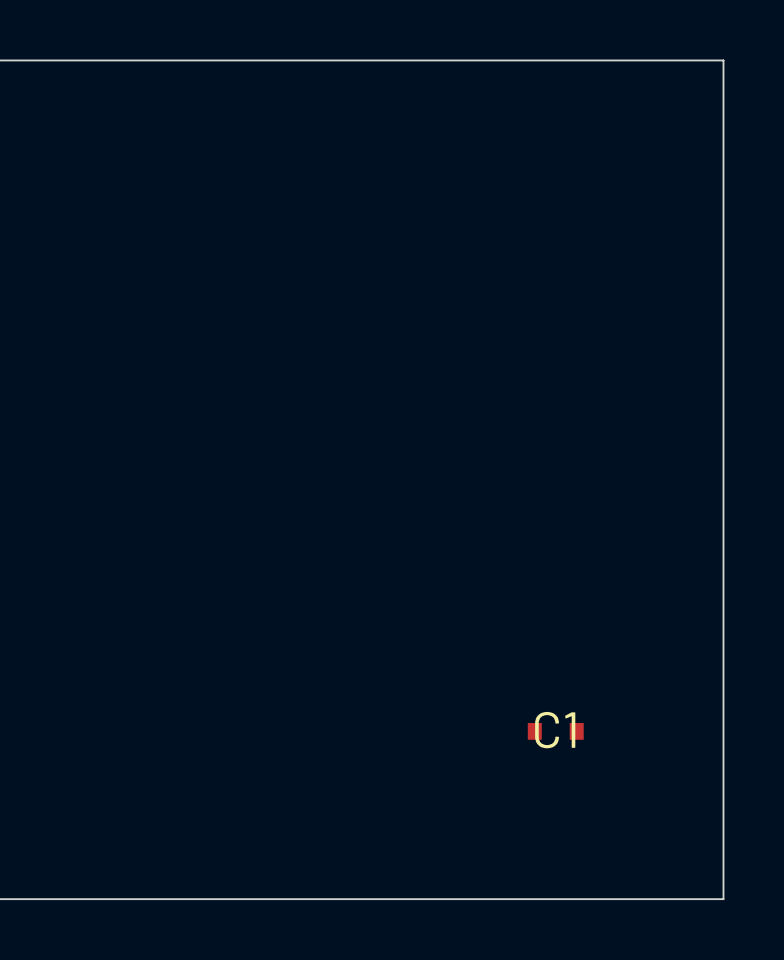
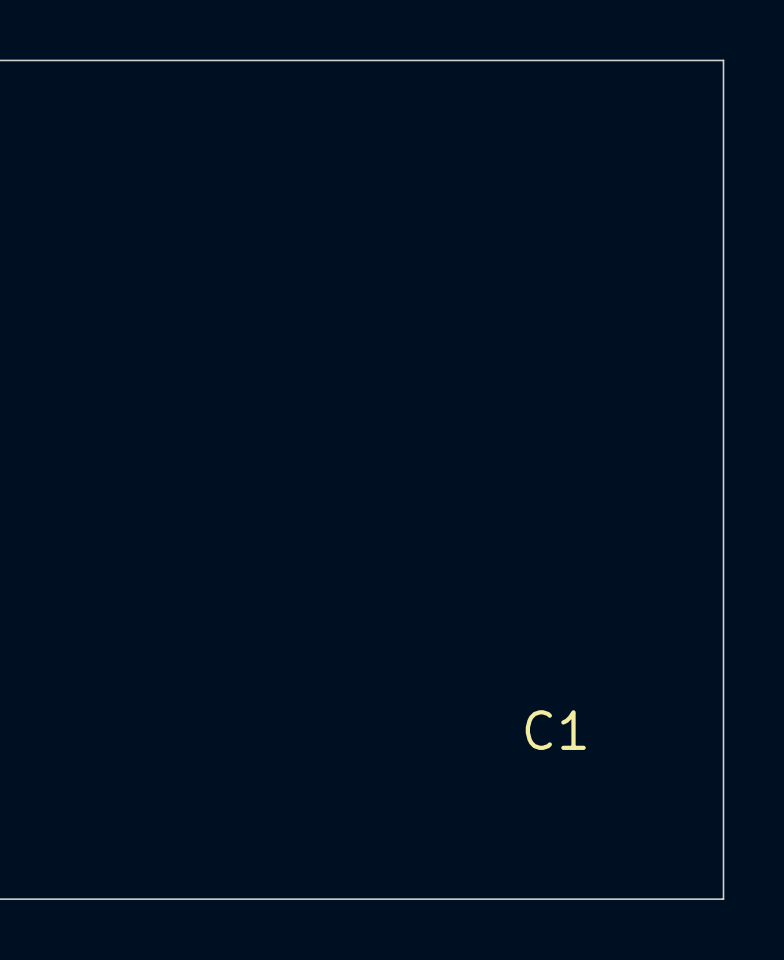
C1 footprint: [527, 723, 584, 740] -> [525, 710, 586, 750]

